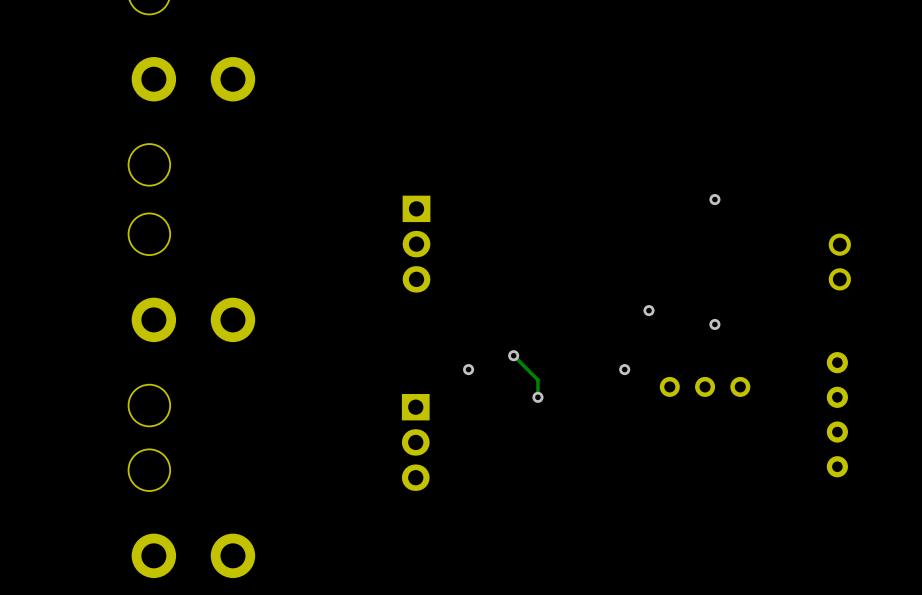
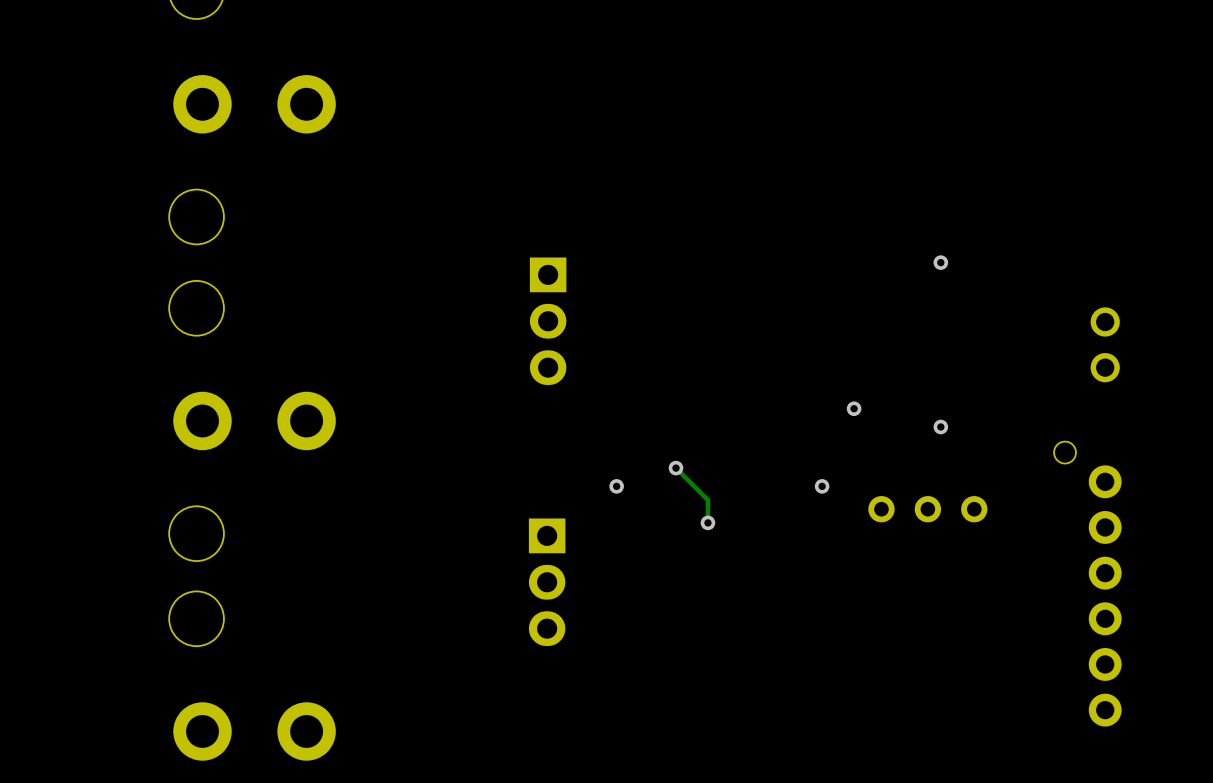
part: (837, 414) -> none
part: none -> (1087, 584)

